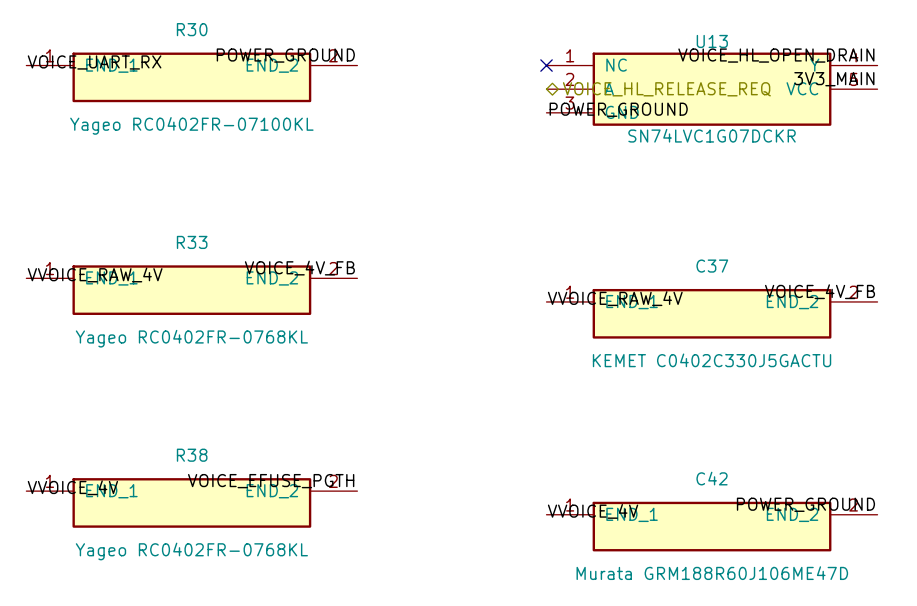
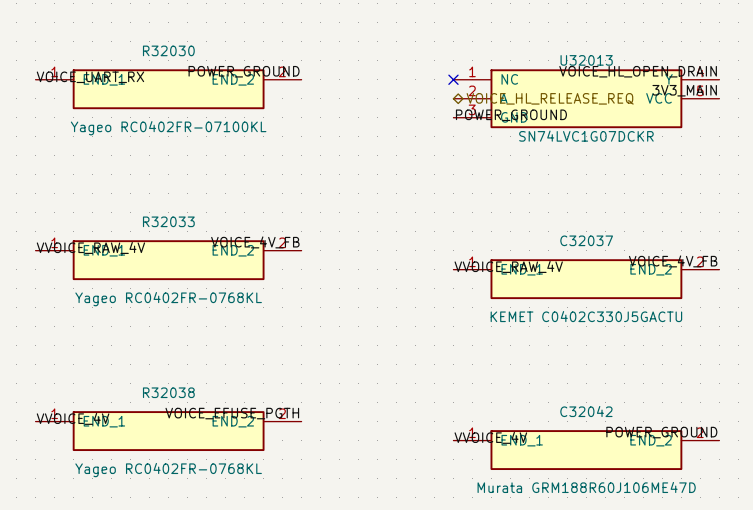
R30 name: R30 (192, 29) -> R32030 (168, 50)
U13 name: U13 (712, 41) -> U32013 (586, 60)
R33 name: R33 (192, 242) -> R32033 (168, 221)
C37 name: C37 (712, 266) -> C32037 (586, 240)
R38 name: R38 (192, 455) -> R32038 (168, 392)
C42 name: C42 (712, 478) -> C32042 (586, 411)

